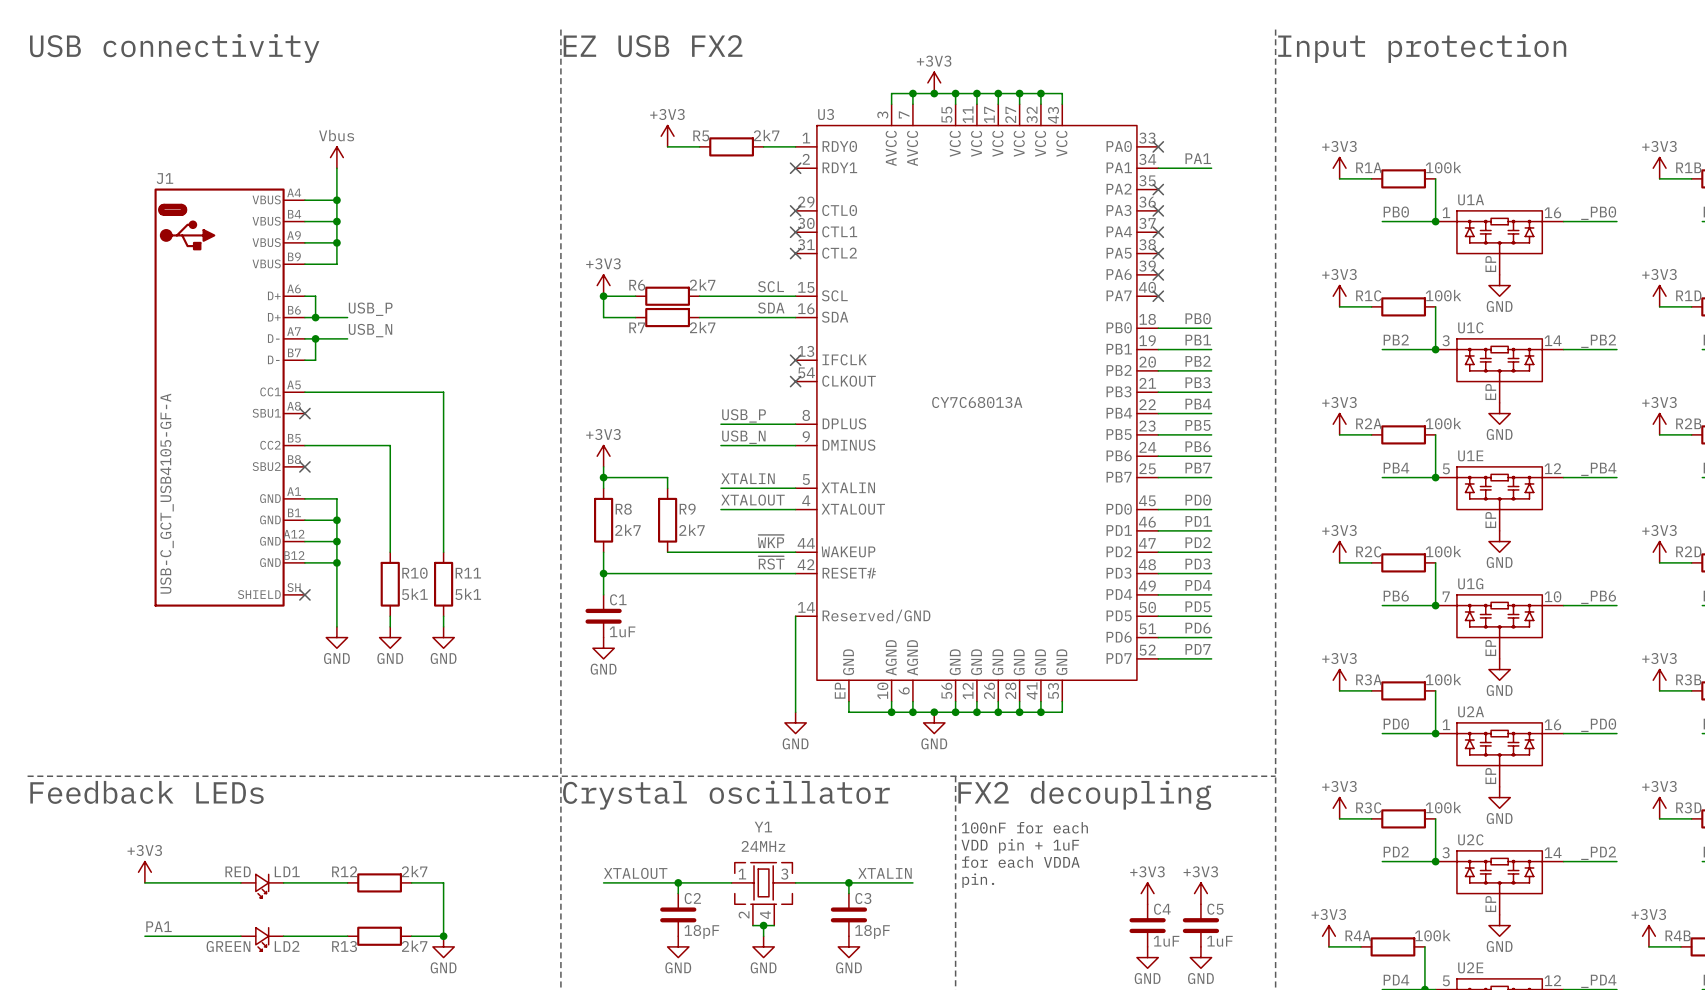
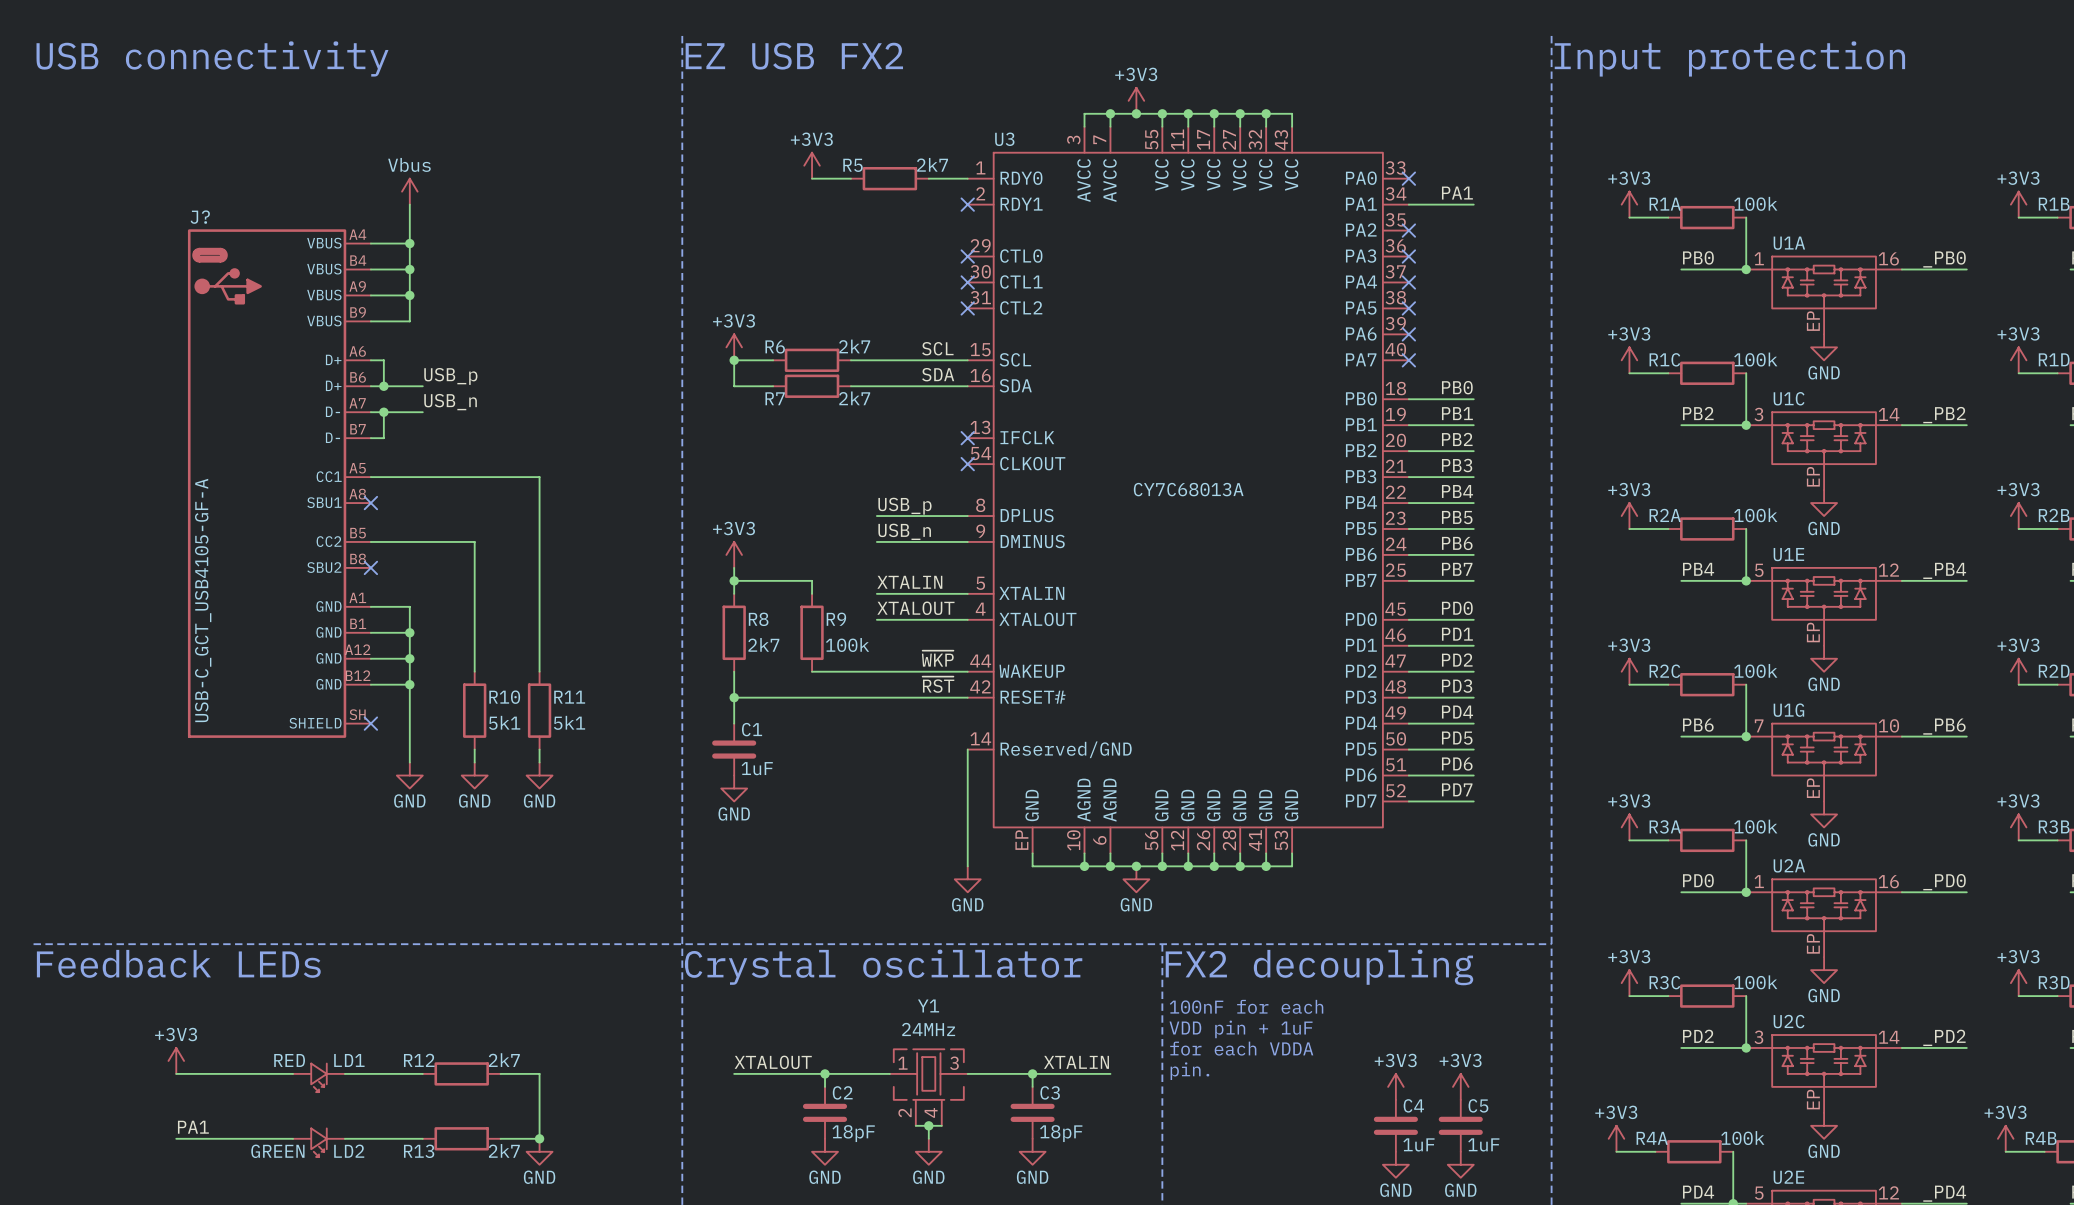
J1 name: J1 (164, 178) -> J? (200, 217)
label: USB_P (370, 309) -> USB_p (450, 376)
label: USB_N (370, 330) -> USB_n (450, 402)
label: USB_P (744, 415) -> USB_p (904, 506)
label: USB_N (743, 437) -> USB_n (904, 531)
R9 value: 2k7 (691, 530) -> 100k (847, 645)

